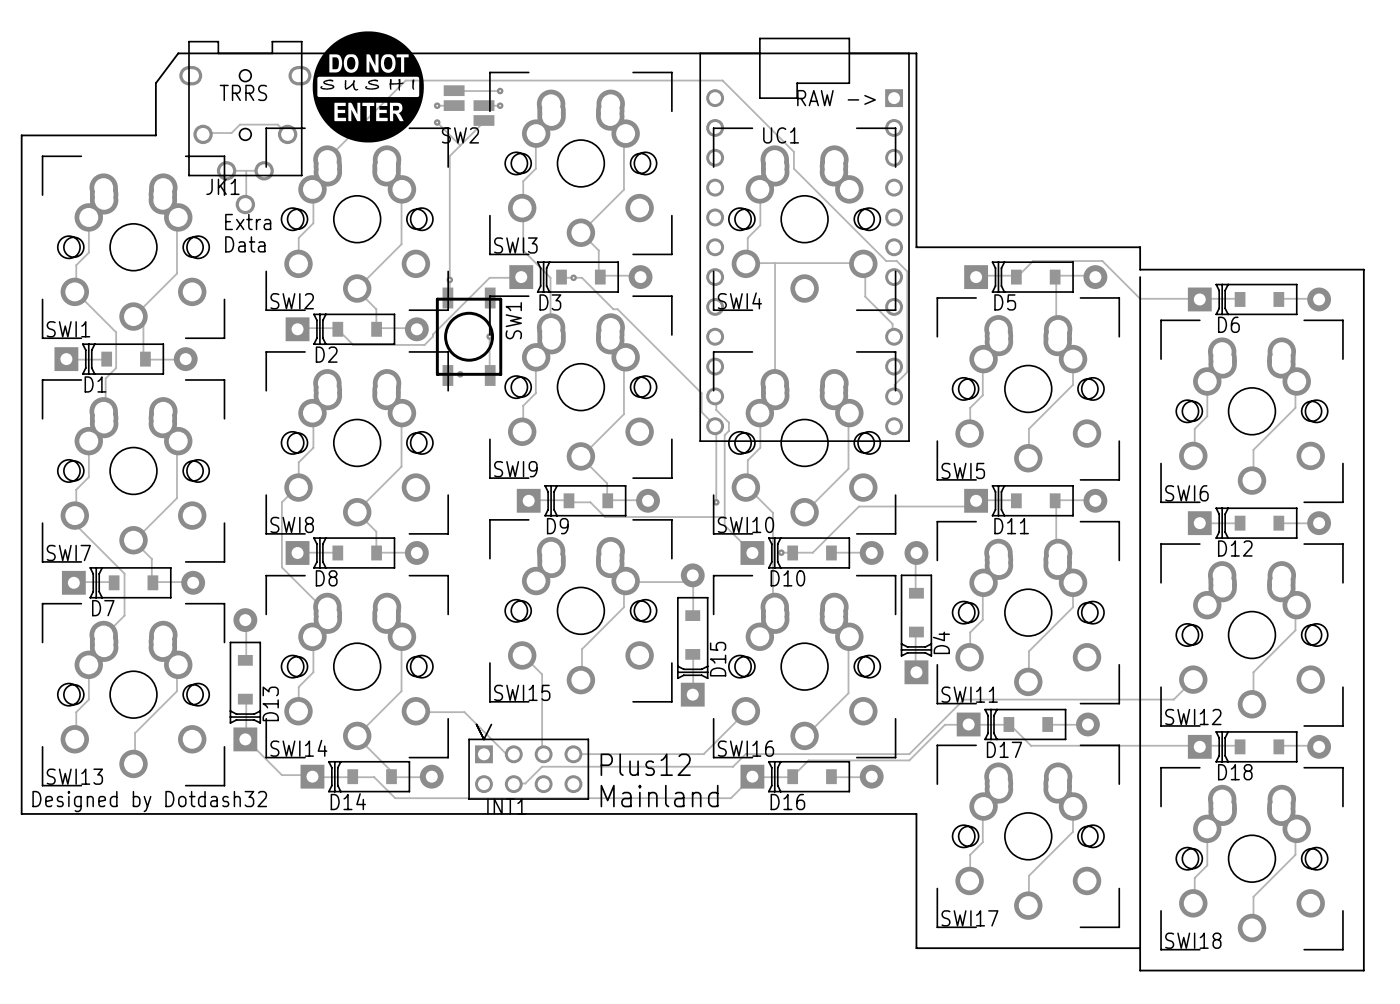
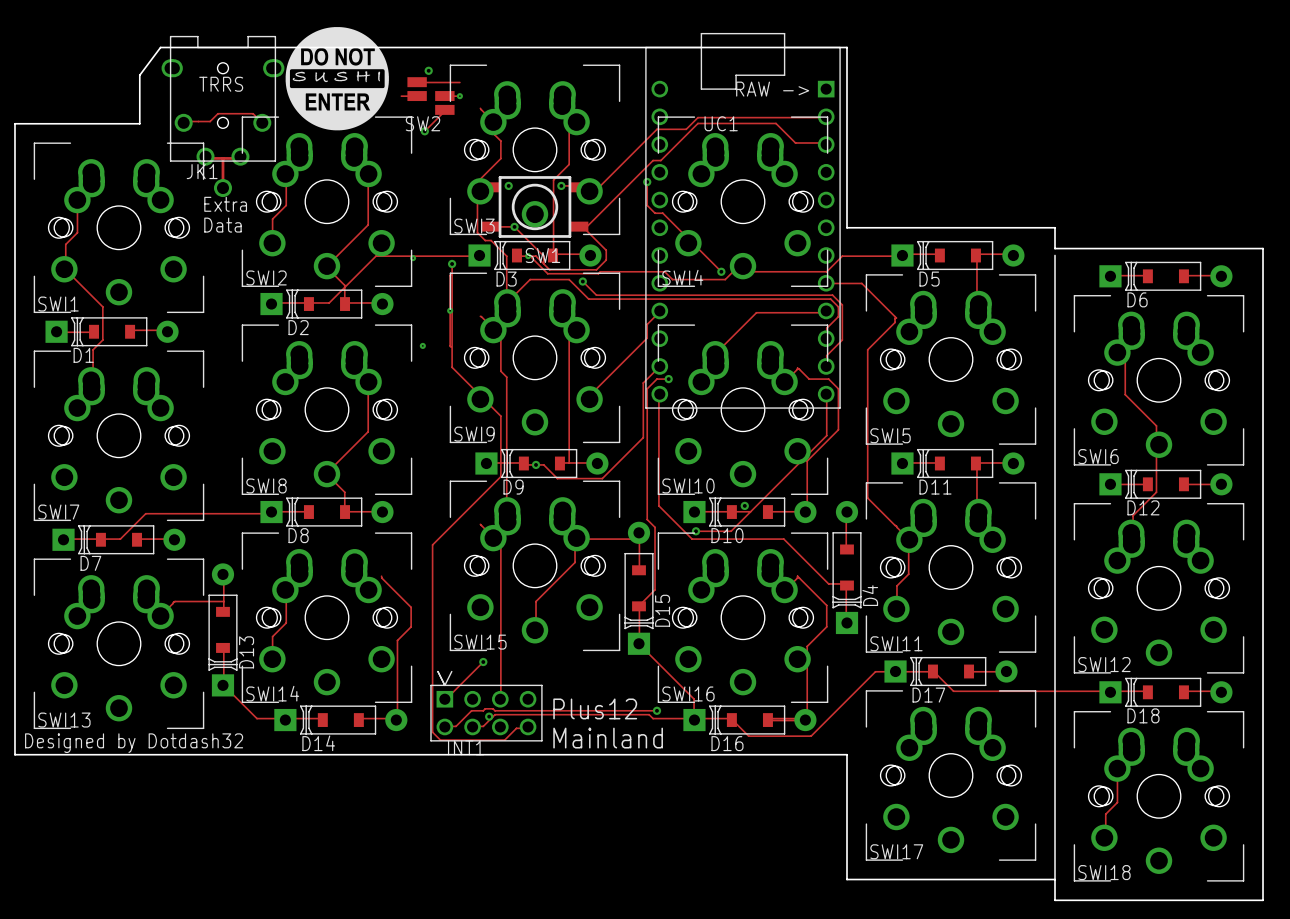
JK1 footprint: [179, 40, 312, 215] -> [161, 35, 285, 198]
via: none -> (428, 70)
via: (500, 91) -> none
via: (437, 105) -> none
track: (437, 122) (460, 145) -> none
via: (437, 122) -> none
track: none -> (826, 116) (697, 117) (686, 129) (656, 129) (600, 185) (561, 185)
track: (536, 133) (535, 168) (523, 181) (522, 208) (523, 250) (533, 261) -> (480, 108) (495, 123) (495, 135) (500, 141) (500, 158) (477, 182) (477, 232) (485, 240) (491, 240)
track: (623, 135) (623, 189) (580, 232) (598, 250) (600, 277) -> (575, 123) (569, 129) (569, 164) (553, 180) (553, 254)
track: (462, 143) (449, 156) (449, 296) (447, 297) -> none
via: none -> (424, 131)
track: (328, 166) (328, 158) (405, 80) (722, 80) (793, 151) (793, 168) (886, 261) (896, 261) (907, 271) (907, 332) -> (508, 301) (530, 279) (569, 279) (588, 299) (830, 299) (838, 306)
track: (226, 170) (264, 170) -> none
track: (246, 170) (245, 204) -> none
track: (759, 189) (760, 225) (747, 237) (747, 263) (863, 263) (865, 265) (865, 296) (892, 323) (894, 336) -> none
track: none -> (647, 182) (647, 205) (655, 213) (662, 213) (721, 271)
via: none -> (647, 182)
track: (162, 200) (162, 202) (178, 217) (177, 273) (133, 316) (143, 326) (143, 357) (145, 359) (185, 359) -> (130, 331) (167, 331)
via: none -> (508, 185)
via: none -> (561, 185)
track: none -> (491, 226) (514, 226) (543, 256) (543, 263)
via: none -> (514, 226)
track: (775, 263) (775, 382) -> (826, 310) (824, 312) (756, 312) (715, 353)
track: none -> (528, 254) (547, 273) (664, 271) (672, 279) (725, 279) (733, 271) (826, 271) (842, 256) (902, 255)
track: (489, 277) (424, 344) (353, 344) (337, 329) -> (450, 256) (376, 256) (329, 302) (308, 304)
track: (1016, 277) (1033, 261) (1102, 261) (1140, 298) (1199, 299) -> none
track: none -> (452, 263) (452, 367) (500, 416) (500, 476) (432, 544) (432, 732) (440, 740)
via: none -> (452, 263)
SW1 footprint: [435, 287, 503, 386] -> [481, 176, 589, 238]
track: (596, 292) (613, 309) (617, 309) (701, 393) (701, 412) (716, 426) (716, 502) -> (549, 269) (596, 269) (606, 260) (606, 250) (582, 226) (578, 226) (584, 228) (653, 160) (660, 160) (697, 123) (776, 123) (795, 142) (824, 142) (826, 144)
via: none -> (721, 271)
track: none -> (582, 281) (596, 295) (832, 295) (842, 304) (842, 340) (838, 343)
via: none -> (582, 281)
track: none -> (826, 283) (861, 283) (896, 318) (895, 322) (867, 349) (867, 498) (908, 539)
SW1 name position: SW1 (513, 320) -> SW1 (542, 255)
track: none -> (659, 310) (647, 324) (647, 338) (592, 392)
track: none -> (480, 316) (500, 336) (500, 371) (506, 377) (507, 516)
track: (907, 342) (907, 372) -> (838, 316) (826, 328) (826, 338)
track: (536, 357) (535, 393) (523, 405) (522, 431) -> none
track: (623, 357) (623, 414) (580, 456) (607, 483) (607, 500) -> (575, 330) (569, 336) (569, 462)
track: (983, 359) (982, 395) (970, 407) (969, 433) -> none
track: (1073, 359) (1073, 384) (1028, 428) (1028, 458) -> none
track: (1296, 381) (1295, 407) (1253, 449) (1251, 480) -> none
track: (1207, 382) (1207, 416) (1194, 428) (1193, 455) -> (1117, 353) (1125, 361) (1125, 394) (1156, 425) (1156, 492) (1133, 515) (1131, 539)
track: (833, 395) (834, 383) (833, 397) (849, 413) (848, 468) (804, 512) -> none
track: (715, 396) (716, 410) (728, 422) (728, 430) (724, 435) (724, 525) (752, 552) -> (659, 366) (643, 382) (643, 437) (602, 478)
track: none -> (668, 379) (656, 379) (647, 388) (647, 519) (655, 527) (655, 589) (638, 606)
via: none -> (668, 379)
track: none -> (785, 381) (797, 368) (809, 379) (828, 379) (838, 388) (838, 429) (807, 461) (807, 511) (805, 512)
track: (312, 413) (313, 447) (298, 462) (298, 487) (281, 502) (281, 567) (319, 605) (325, 605) (328, 607) (327, 613) -> none
track: (759, 413) (760, 447) (747, 460) (747, 485) (745, 487) (772, 512) (772, 605) (777, 615) (775, 619) (777, 619) -> none
track: (162, 423) (178, 441) (177, 498) (133, 540) (151, 558) (152, 582) -> none
track: none -> (659, 394) (658, 505) (692, 539) (783, 539) (828, 583) (846, 583) (847, 585)
track: (88, 441) (88, 477) (76, 489) (76, 525) (124, 573) (124, 615) (103, 635) -> none
track: (976, 500) (970, 506) (858, 506) -> (826, 394) (826, 435) (793, 468)
via: none -> (536, 464)
via: (716, 502) -> none
track: (653, 517) (724, 517) -> none
via: none -> (744, 505)
track: none -> (271, 512) (270, 513) (145, 513) (120, 539) (100, 539)
track: none -> (721, 511) (694, 512)
via: (781, 552) -> none
track: none -> (750, 511) (731, 531) (696, 531)
via: none -> (696, 531)
track: (1073, 582) (1073, 607) (1028, 651) (1028, 681) -> none
track: (1296, 605) (1295, 630) (1253, 672) (1251, 704) -> none
track: (384, 619) (401, 636) (401, 691) (357, 737) (391, 770) (391, 776) (431, 776) -> none
track: none -> (381, 576) (411, 607) (411, 626) (397, 640) (397, 718) (358, 720)
track: (849, 636) (848, 693) (804, 735) -> (784, 589) (797, 576) (826, 605) (826, 626) (807, 646) (807, 718) (767, 720)
track: none -> (223, 601) (175, 601) (161, 615)
track: (522, 655) (542, 674) (543, 754) -> (480, 524) (500, 544) (500, 699)
track: (88, 664) (88, 699) (76, 712) (74, 739) -> none
track: (178, 664) (177, 691) (135, 733) (133, 763) -> none
track: (1193, 679) (1173, 699) (963, 699) (909, 754) (745, 754) (733, 766) (712, 766) -> none
track: none -> (638, 643) (694, 699) (694, 718)
track: (415, 711) (464, 712) (506, 754) (513, 754) -> none
track: (745, 711) (703, 754) (573, 754) -> none
track: none -> (483, 662) (444, 699)
via: none -> (483, 662)
track: (947, 724) (909, 760) (808, 760) (791, 777) (752, 776) (730, 798) (548, 798) -> (875, 671) (811, 736) (748, 736) (731, 718) (694, 718)
track: (542, 766) (537, 770) -> (498, 710) (493, 708) (471, 710) (456, 726) (444, 726)
via: none -> (656, 710)
track: none -> (495, 714) (649, 714) (653, 718) (694, 718)
via: none -> (489, 716)
track: (312, 776) (374, 777) (395, 798) (479, 798) -> (285, 720) (322, 720)
track: none -> (528, 726) (516, 728) (504, 740)
track: (983, 806) (982, 842) (970, 854) (969, 880) -> none
track: (1073, 806) (1073, 831) (1028, 875) (1028, 905) -> none
track: (1296, 828) (1295, 854) (1253, 896) (1251, 927) -> none

